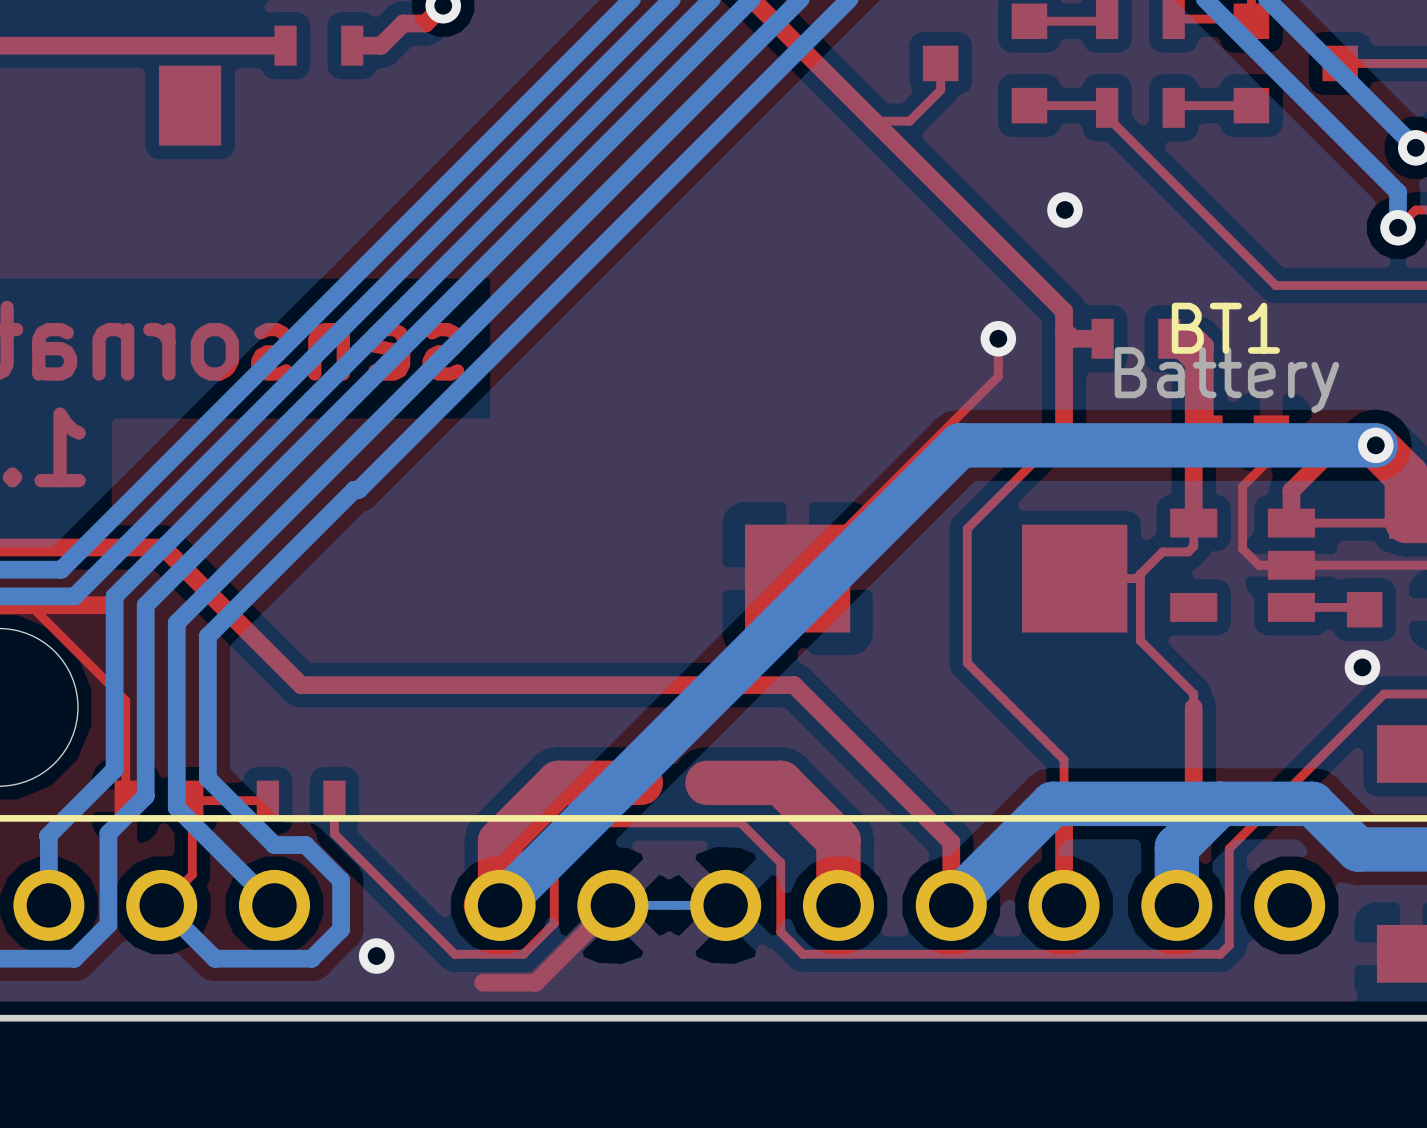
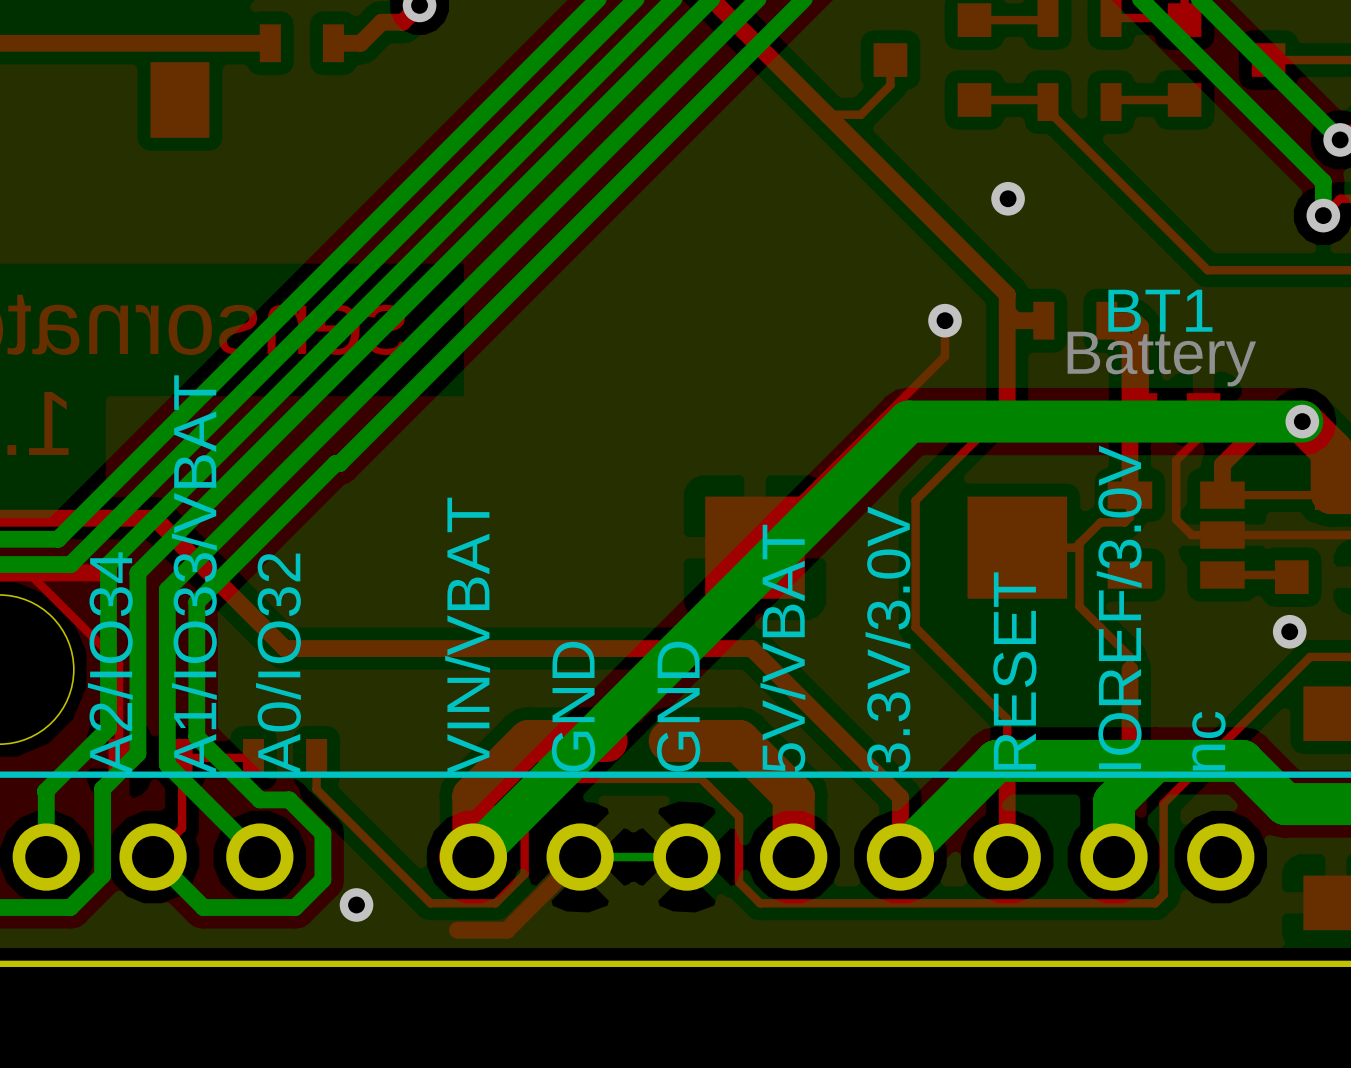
text: none -> A1/IO33/VBAT (194, 574)
text: none -> IOREF/3.0V (1119, 607)
text: none -> 3.3V/3.0V (887, 639)
text: none -> VIN/VBAT (467, 636)
text: none -> 5V/VBAT (782, 648)
text: none -> A2/IO34 (110, 663)
text: none -> A0/IO32 (278, 664)
text: none -> RESET (1014, 671)
text: none -> GND (573, 706)
text: none -> GND (678, 706)
text: none -> nc (1208, 741)

